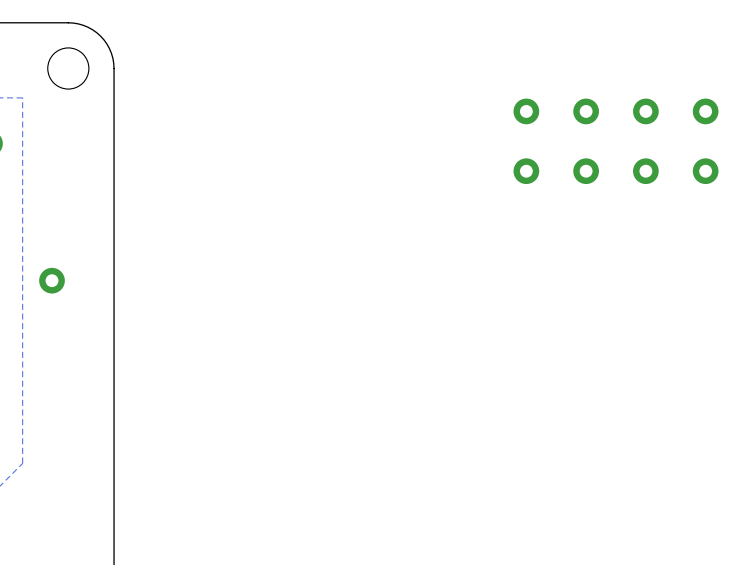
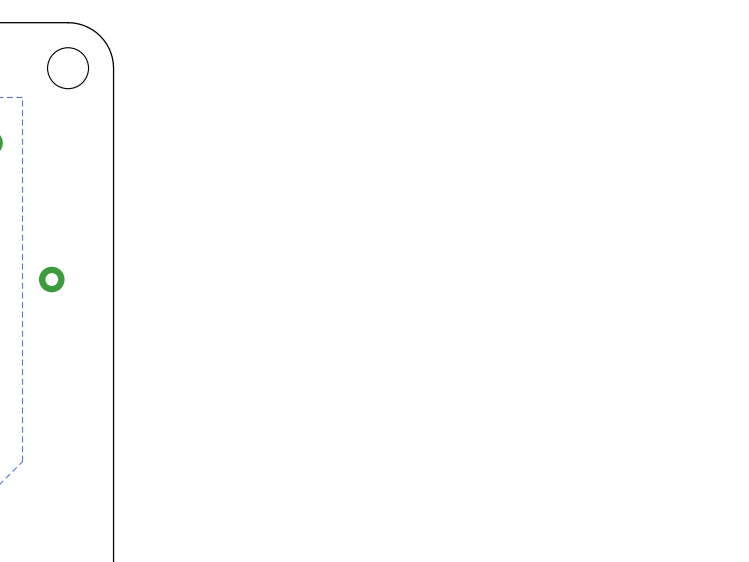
part: (526, 111) -> none
part: (586, 111) -> none
part: (645, 111) -> none
part: (705, 111) -> none
part: (526, 171) -> none
part: (586, 171) -> none
part: (645, 171) -> none
part: (705, 171) -> none

